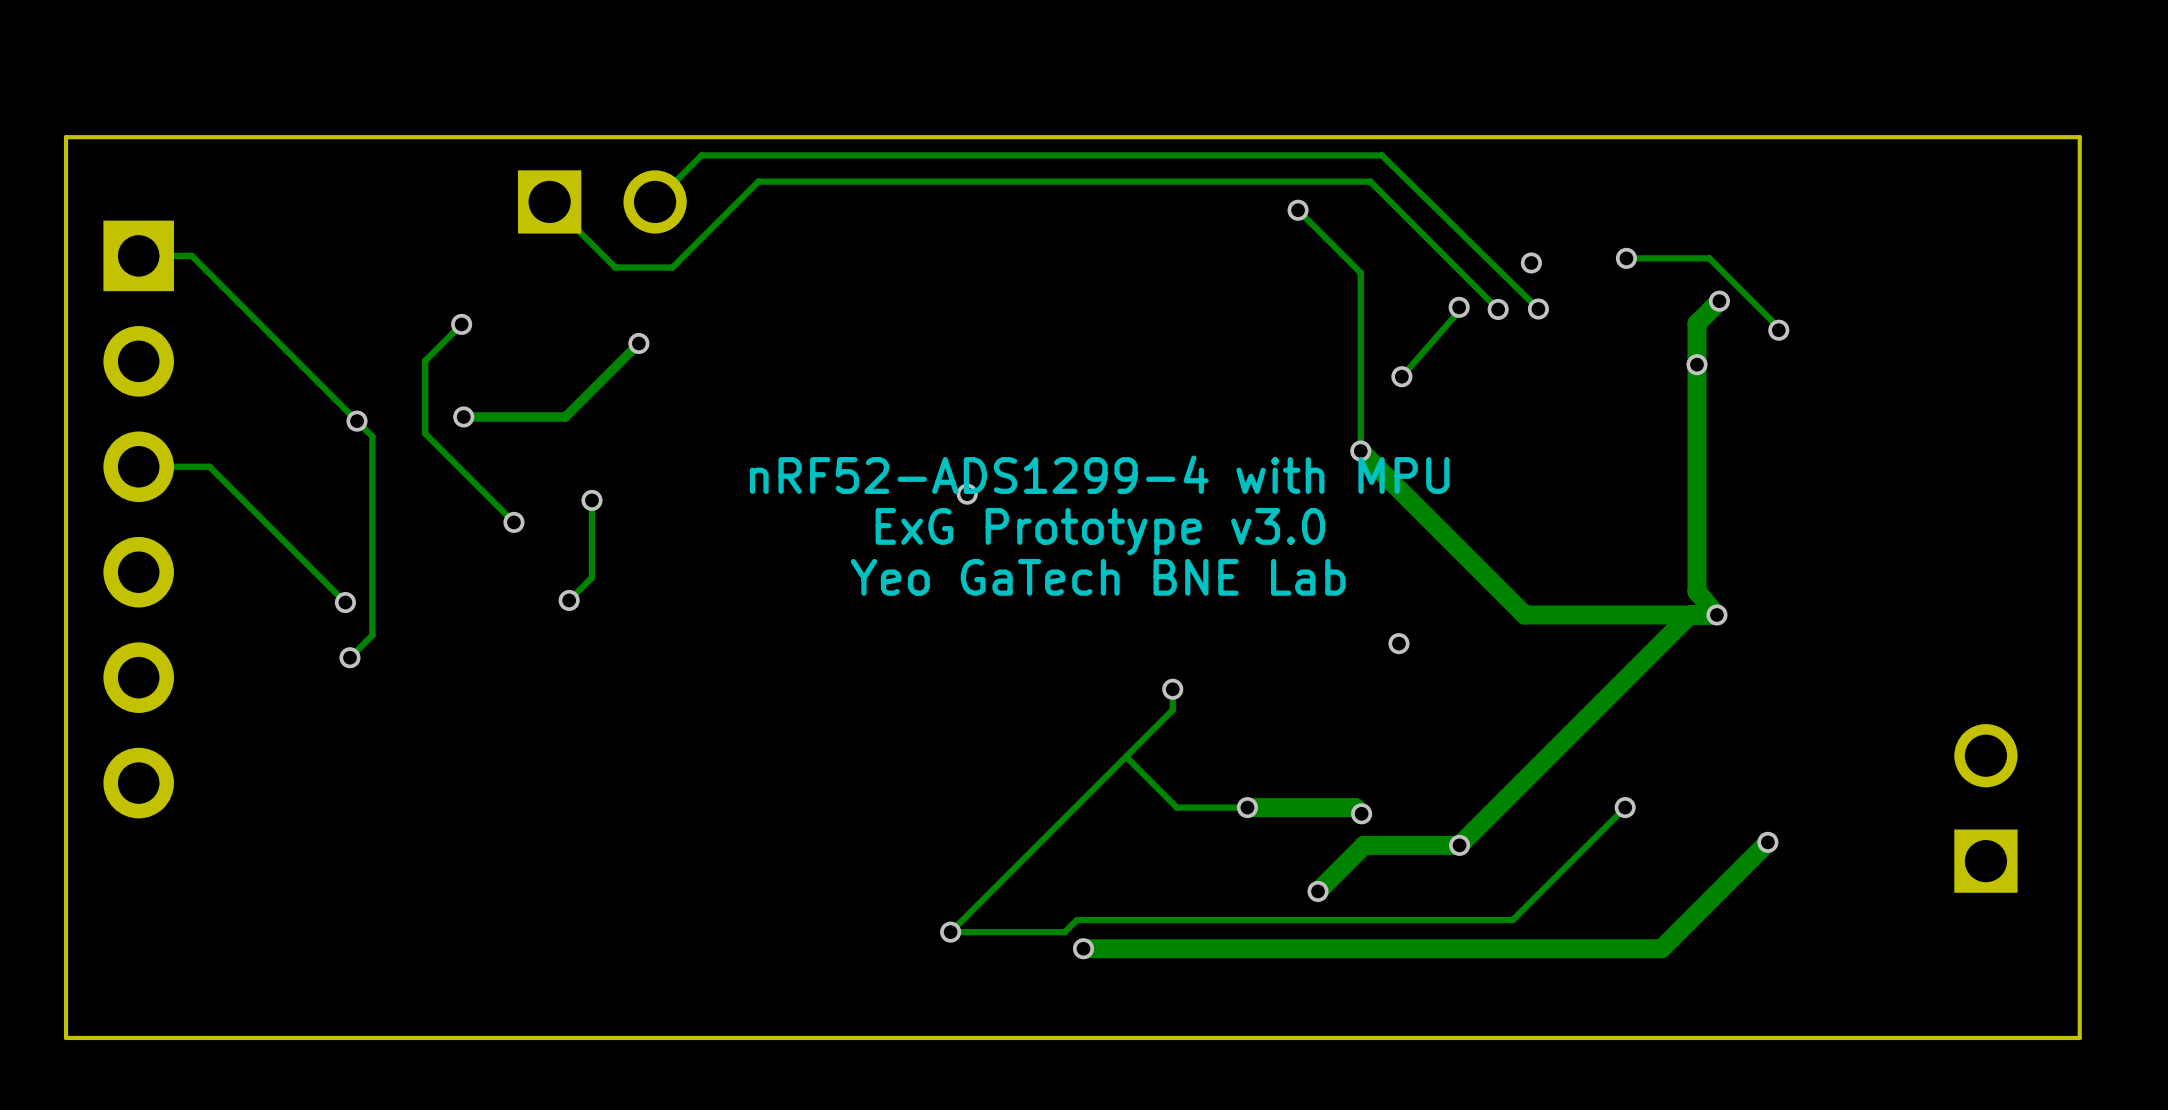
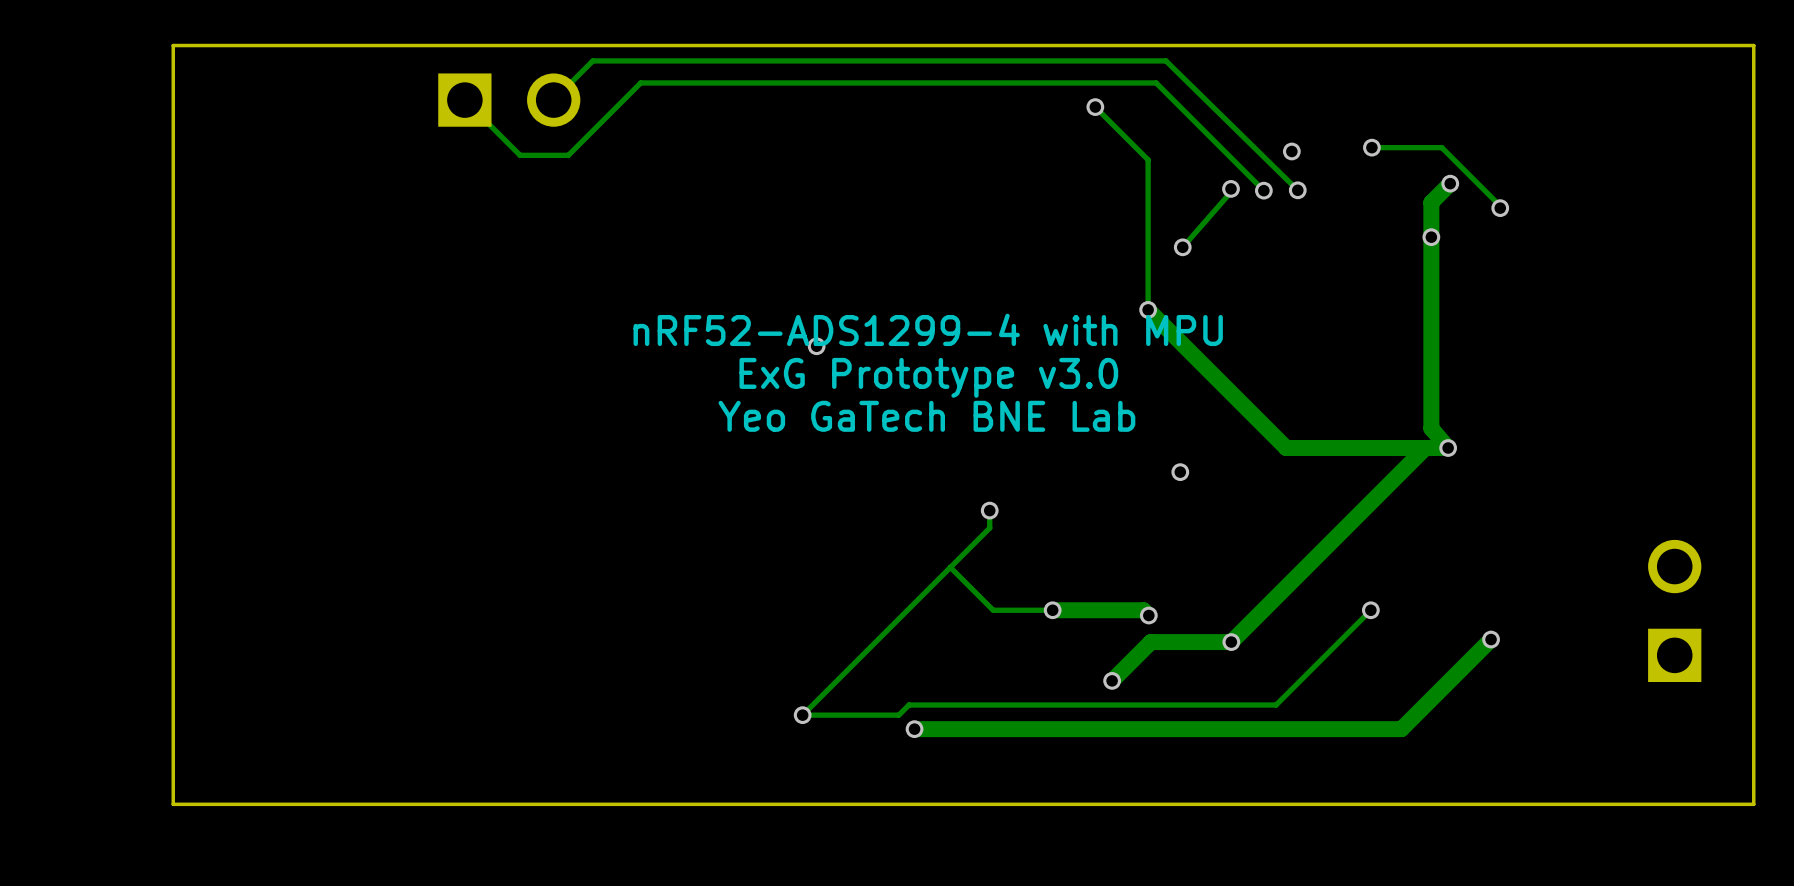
board edge: (203, 137) (66, 137) (66, 1037) (203, 1037) -> (173, 45) (173, 804)
track: (138, 255) (191, 255) (372, 436) (372, 635) (349, 657) -> none
track: (461, 324) (425, 360) (425, 433) (513, 522) -> none
via: (461, 324) -> none
track: (638, 343) (565, 416) (463, 416) -> none
via: (638, 343) -> none
via: (463, 416) -> none
via: (357, 421) -> none
track: (138, 466) (209, 466) (345, 602) -> none
track: (591, 500) (591, 577) (569, 600) -> none
via: (591, 500) -> none
part: (138, 519) -> none
via: (513, 522) -> none
via: (569, 600) -> none
via: (345, 602) -> none
via: (349, 657) -> none

